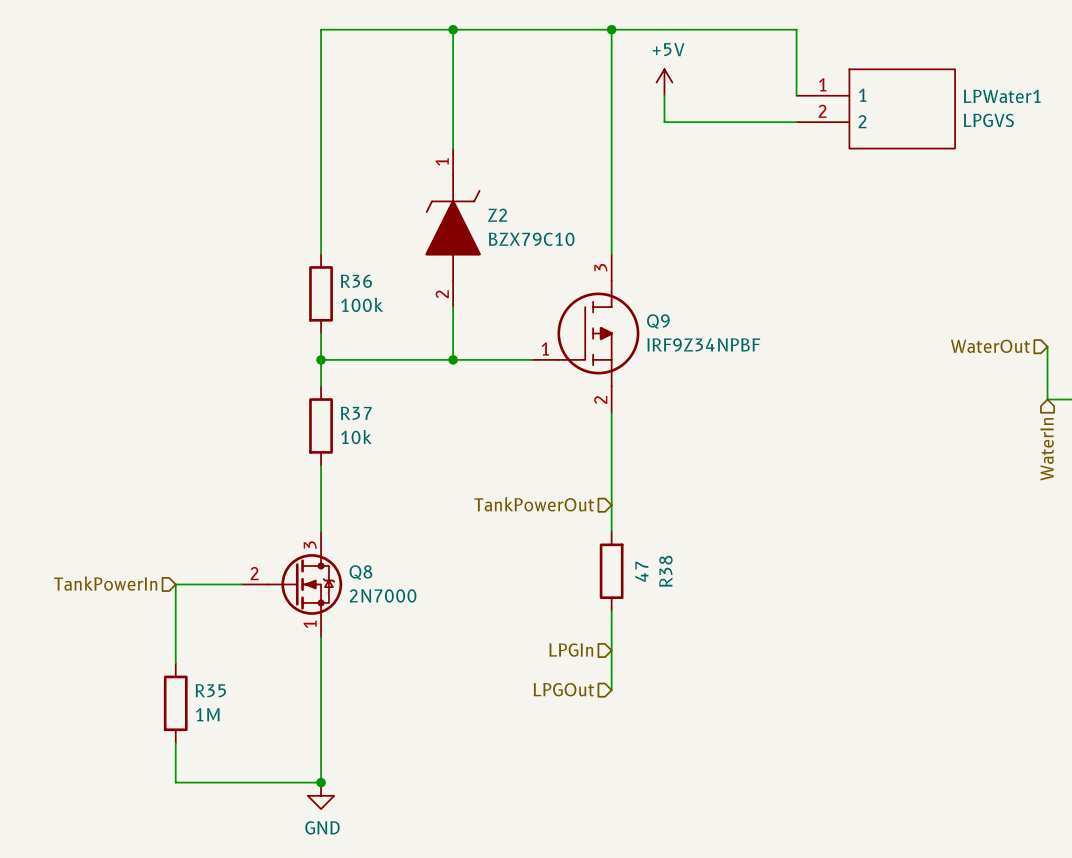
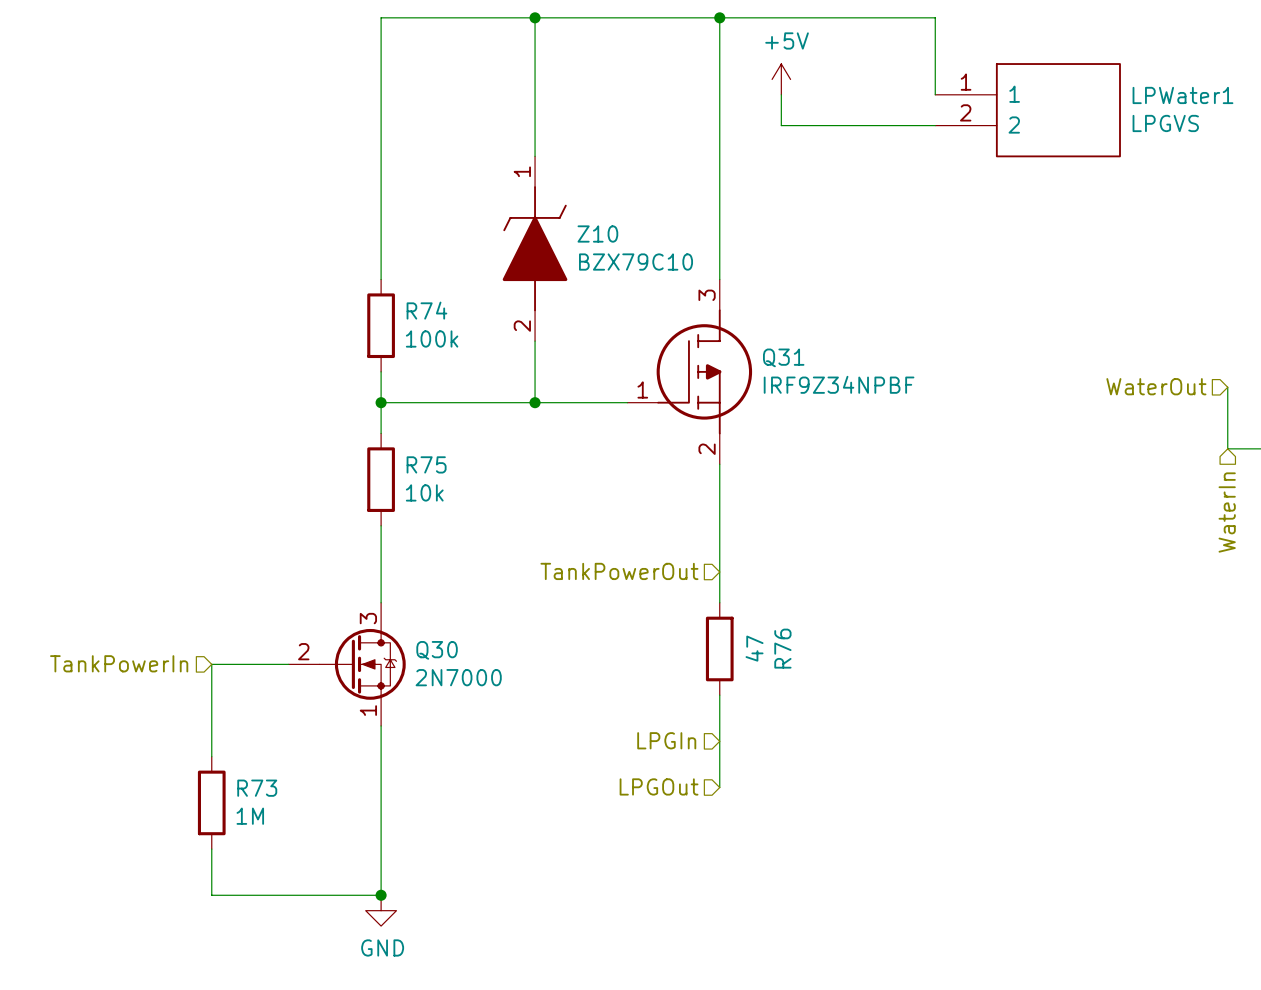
Z2 name: Z2 (497, 215) -> Z10 (597, 234)
R36 name: R36 (356, 281) -> R74 (426, 310)
Q9 name: Q9 (658, 321) -> Q31 (783, 357)
R37 name: R37 (356, 413) -> R75 (426, 464)
R38 name: R38 (665, 571) -> R76 (782, 648)
Q8 name: Q8 (360, 572) -> Q30 (437, 650)
R35 name: R35 (210, 690) -> R73 (257, 788)

